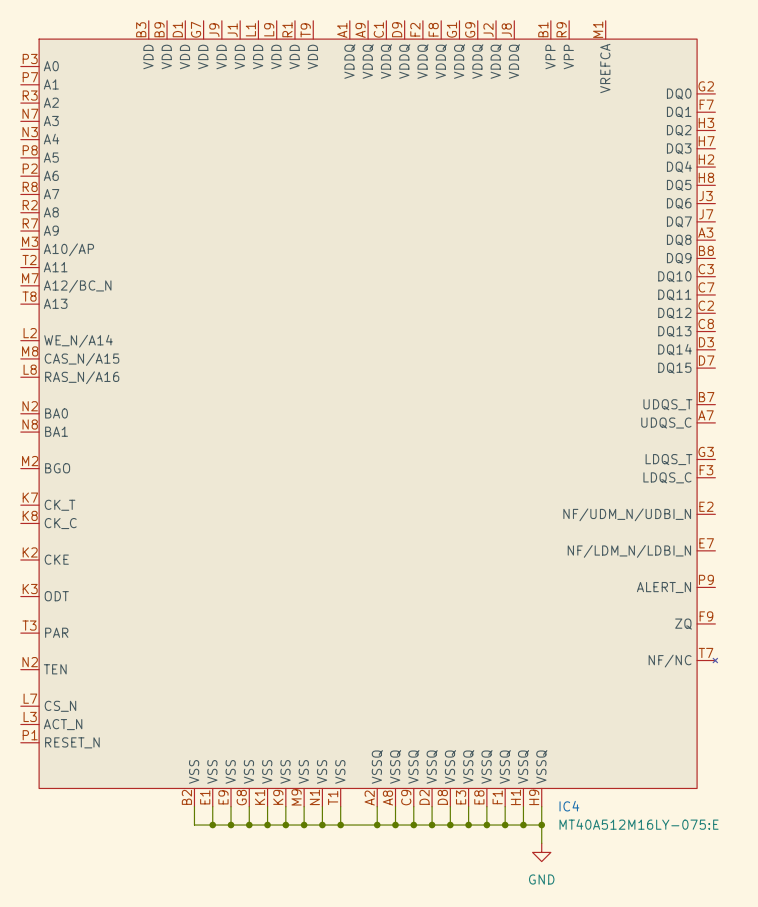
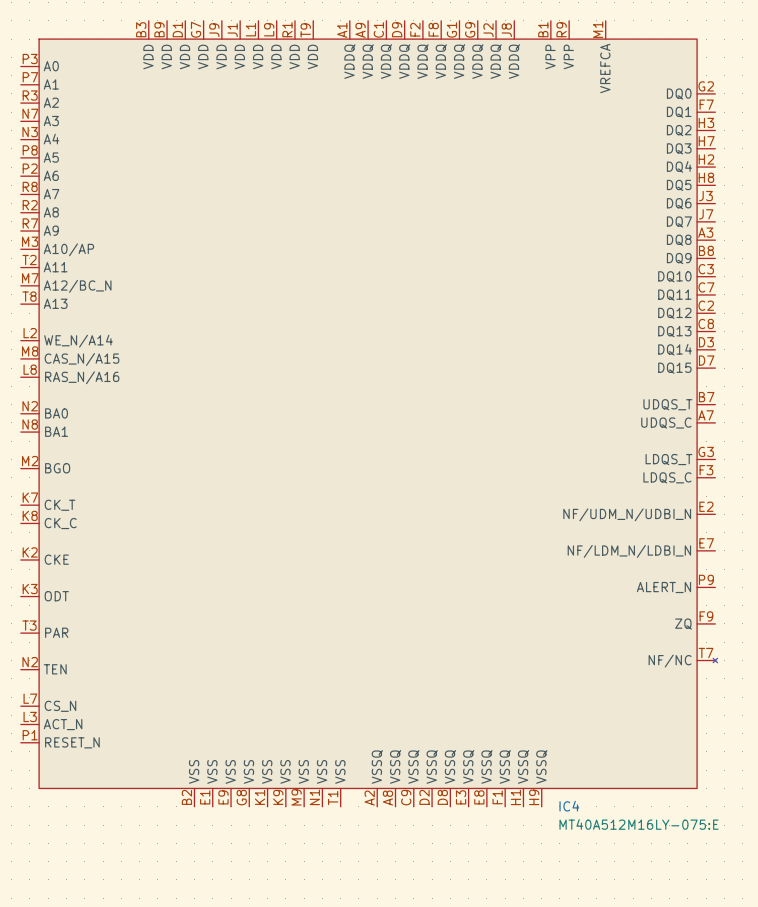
wire: (194, 806) (194, 825) (541, 825) -> none
wire: (212, 806) (212, 825) -> none
wire: (231, 806) (231, 825) -> none
wire: (249, 806) (249, 825) -> none
wire: (267, 806) (267, 825) -> none
wire: (285, 806) (285, 825) -> none
wire: (304, 806) (304, 825) -> none
wire: (322, 806) (322, 825) -> none
wire: (340, 806) (340, 825) -> none
wire: (377, 806) (377, 825) -> none
wire: (395, 806) (395, 825) -> none
wire: (413, 806) (413, 825) -> none
wire: (432, 806) (432, 825) -> none
wire: (450, 806) (450, 825) -> none
wire: (468, 806) (468, 825) -> none
wire: (486, 806) (486, 825) -> none
wire: (505, 806) (505, 825) -> none
wire: (523, 806) (523, 825) -> none
wire: (541, 806) (541, 843) -> none
junction: (212, 825) -> none
junction: (231, 825) -> none
junction: (249, 825) -> none
junction: (267, 825) -> none
junction: (285, 825) -> none
junction: (304, 825) -> none
junction: (322, 825) -> none
junction: (340, 825) -> none
junction: (377, 825) -> none
junction: (395, 825) -> none
junction: (413, 825) -> none
junction: (432, 825) -> none
junction: (450, 825) -> none
junction: (468, 825) -> none
junction: (486, 825) -> none
junction: (505, 825) -> none
junction: (523, 825) -> none
junction: (541, 825) -> none
power symbol: GND (541, 852) -> none

